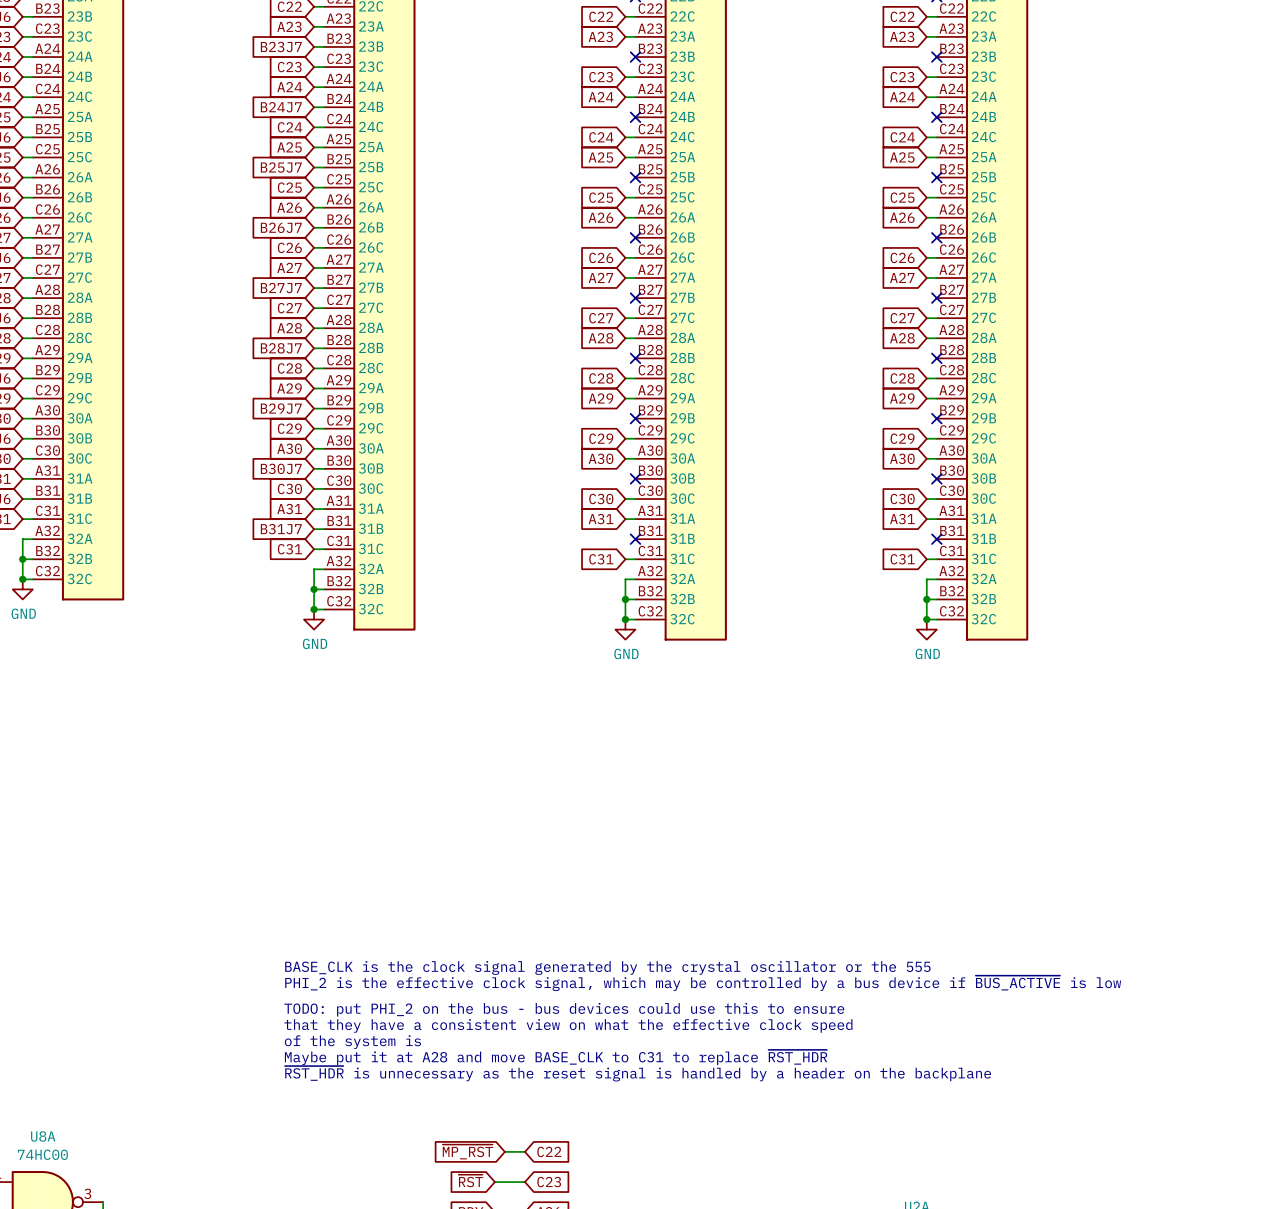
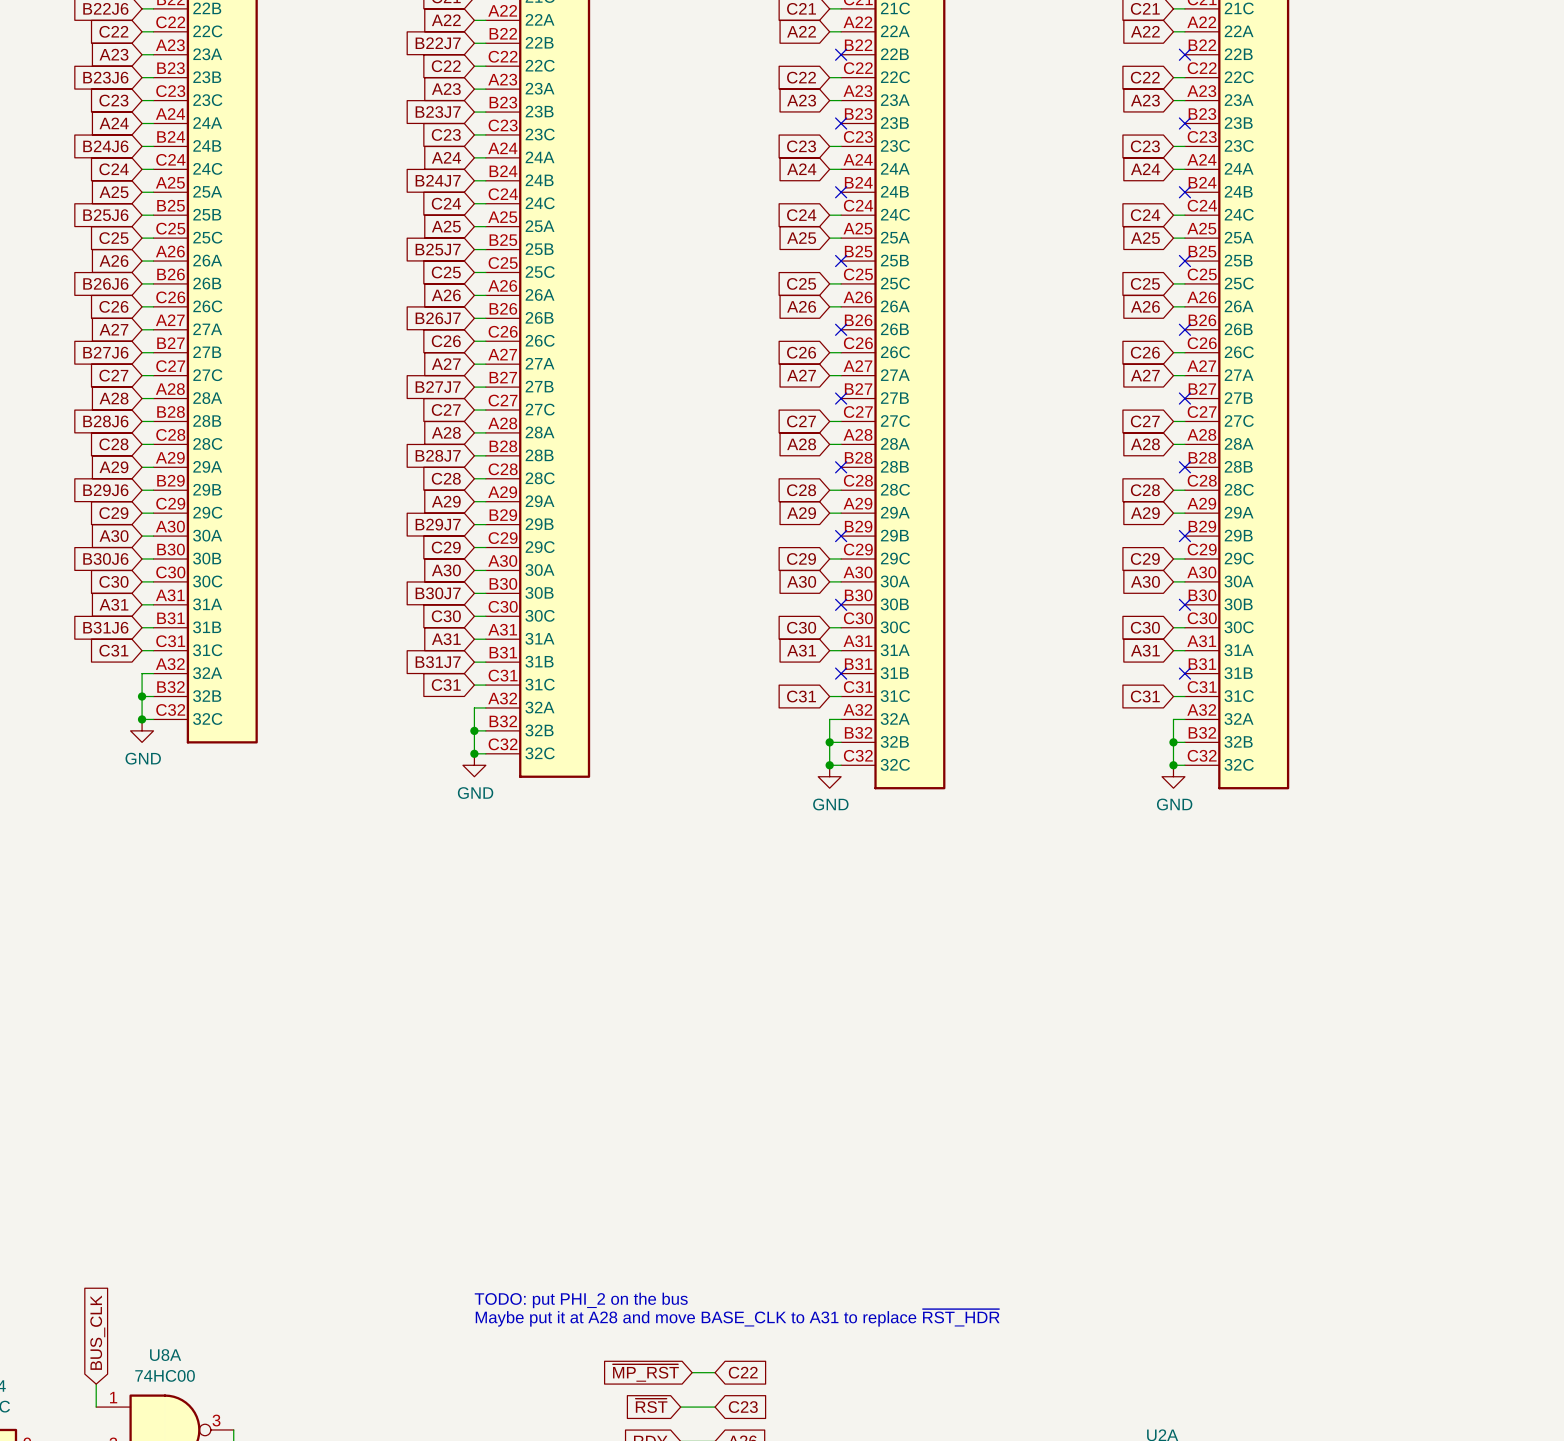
text: BASE_CLK is the clock signal generated by the crystal oscillator or the 555 (607, 967) -> none
text: PHI_2 is the effective clock signal, which may be controlled by a bus device if ~{BUS_ACTIVE} is low (703, 983) -> none
text: TODO: put PHI_2 on the bus - bus devices could use this to ensure (564, 1009) -> none
text: that they have a consistent view on what the effective clock speed (568, 1025) -> none
text: of the system is (352, 1042) -> none
text: Maybe put it at A28 and move BASE_CLK to C31 to replace ~{RST_HDR} (556, 1057) -> none
text: ~{RST_HDR} is unnecessary as the reset signal is handled by a header on the backplane (637, 1073) -> none
text: none -> TODO: put PHI_2 on the bus (581, 1300)
text: none -> Maybe put it at A28 and move BASE_CLK to A31 to replace ~{RST_HDR} (737, 1317)

